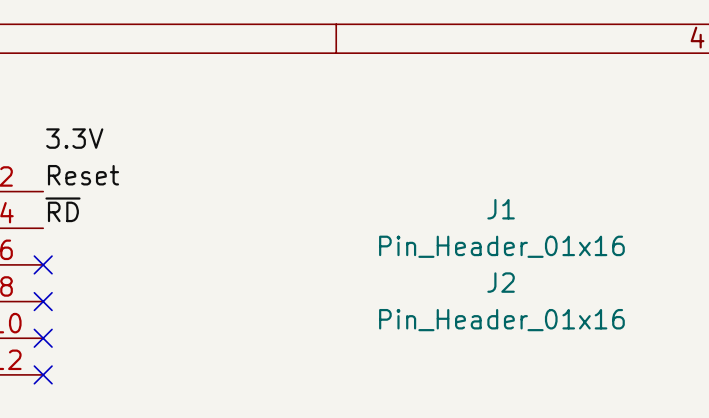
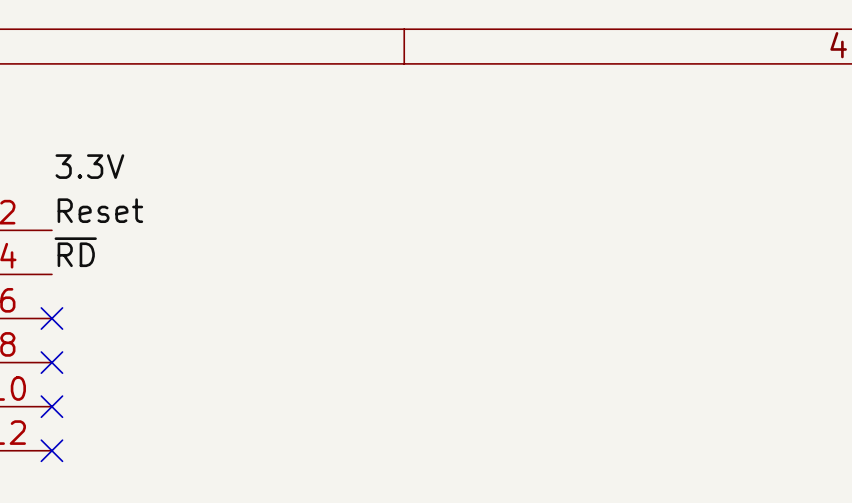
J1: Pin_Header_01x16 (501, 228) -> none
J2: Pin_Header_01x16 (501, 301) -> none

